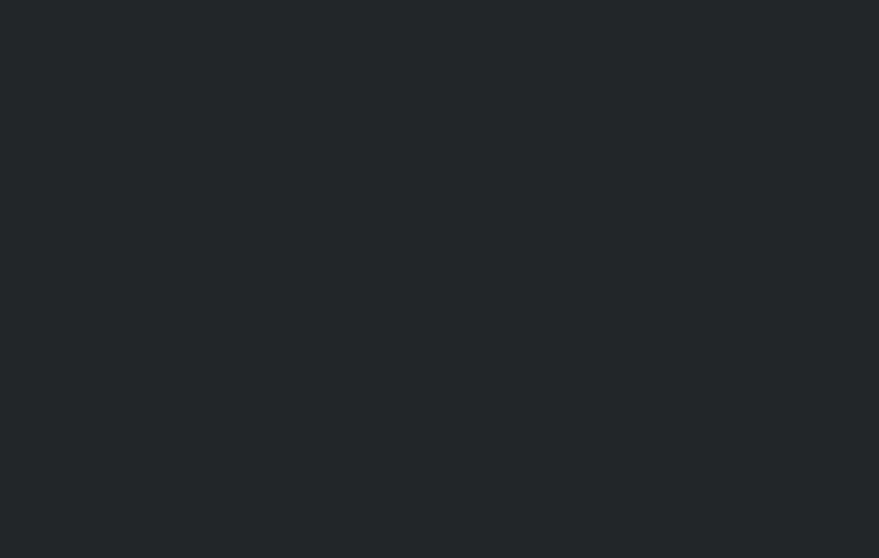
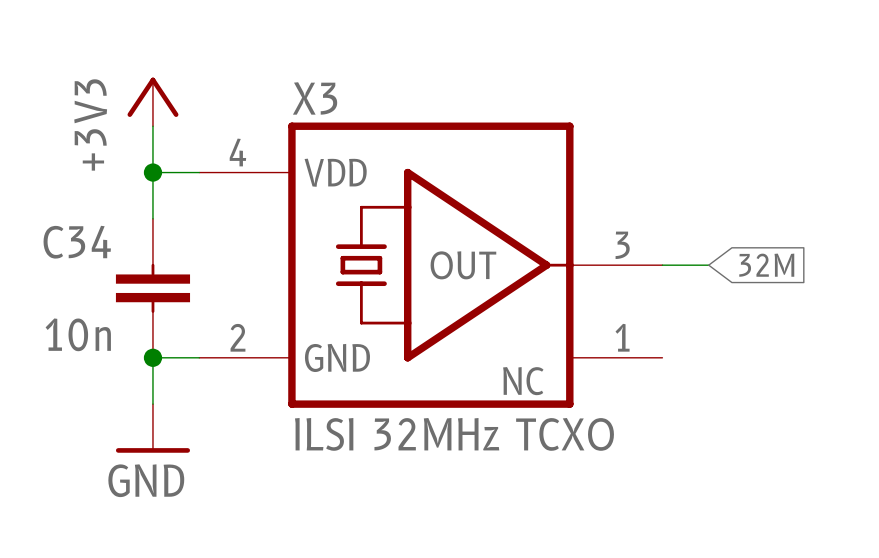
power symbol: none -> +3V3 (152, 101)
wire: none -> (152, 126) (152, 218)
wire: none -> (152, 172) (199, 172)
junction: none -> (152, 172)
X3: none -> ILSI 32MHz TCXO (430, 265)
wire: none -> (662, 265) (708, 265)
global label: none -> 32M (766, 265)
C34: none -> 10n (152, 288)
junction: none -> (152, 357)
wire: none -> (199, 357) (152, 357) (152, 404)
power symbol: none -> GND (152, 428)

